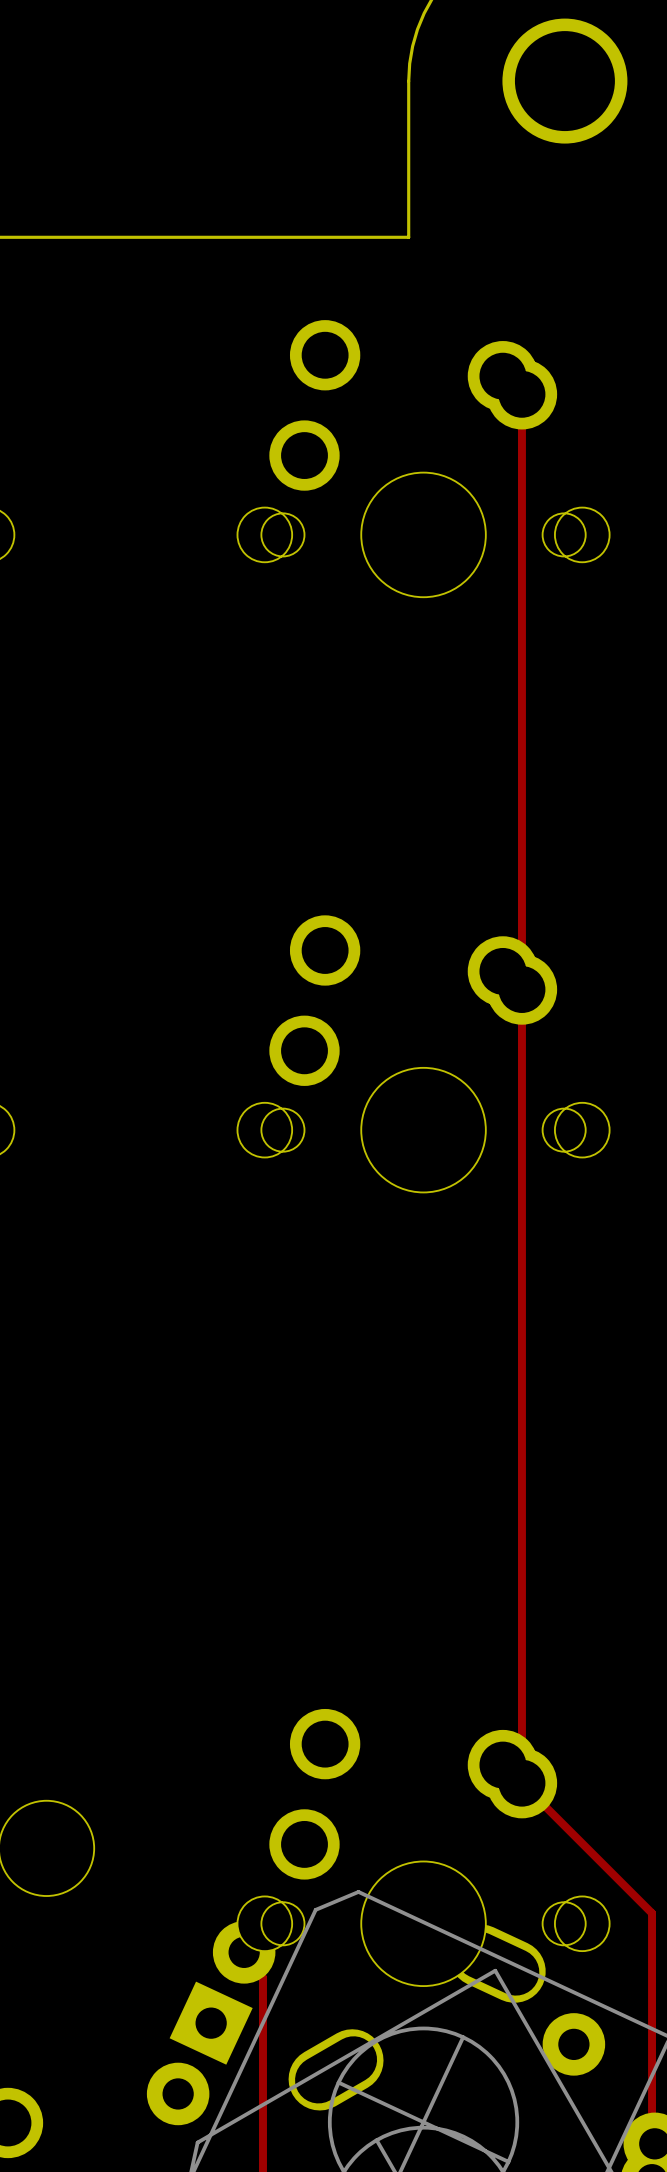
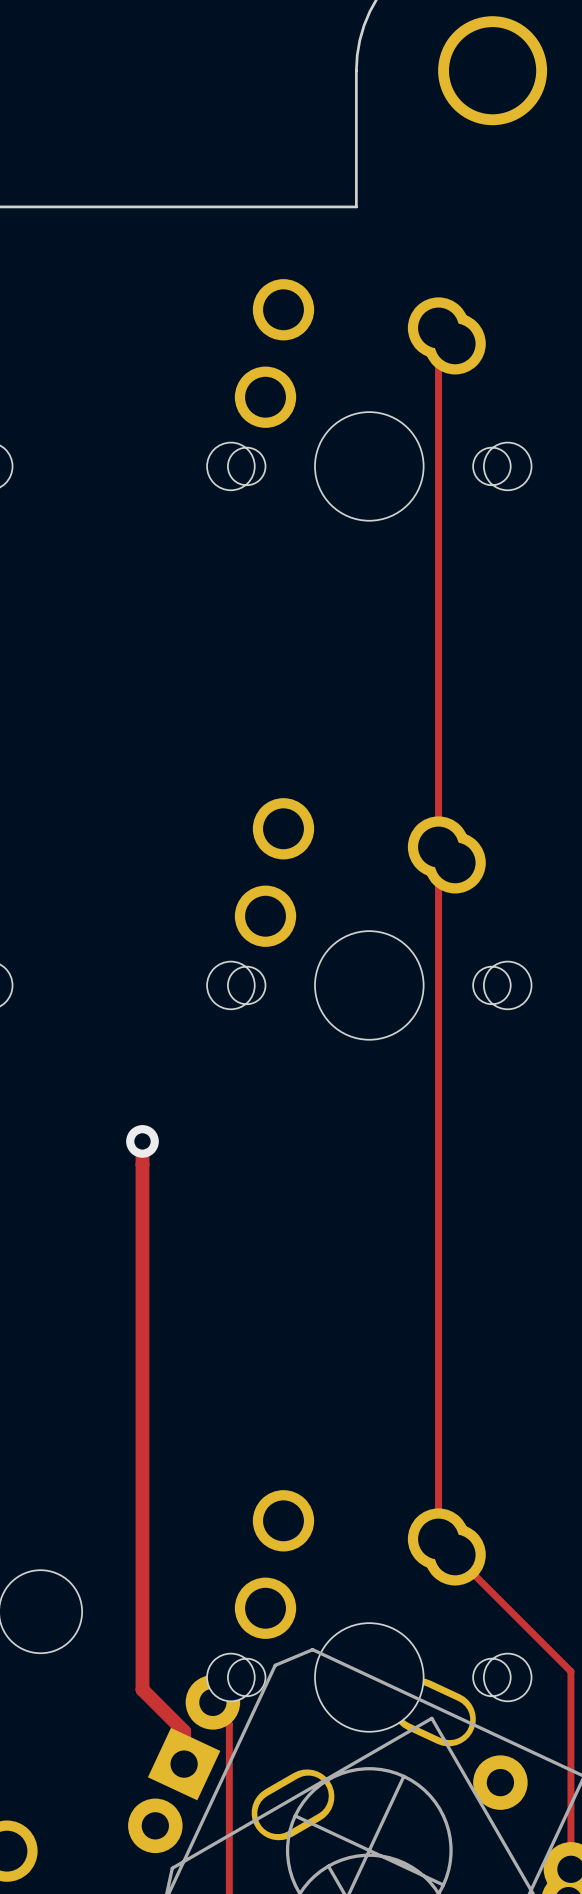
track: (521, 394) (521, 1783) (652, 1913) (652, 2146) -> (438, 328) (438, 1539) (570, 1671) (570, 1869) (568, 1871)
track: none -> (142, 1141) (142, 1689) (184, 1731) (184, 1764)
via: none -> (142, 1141)

